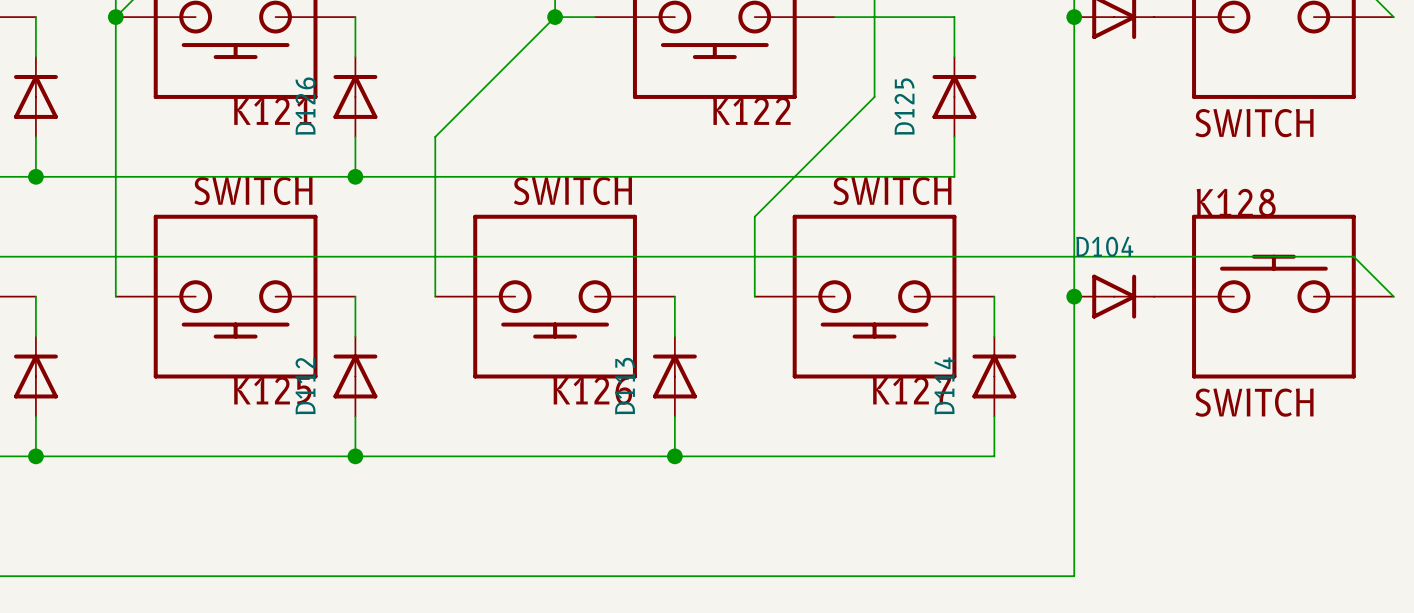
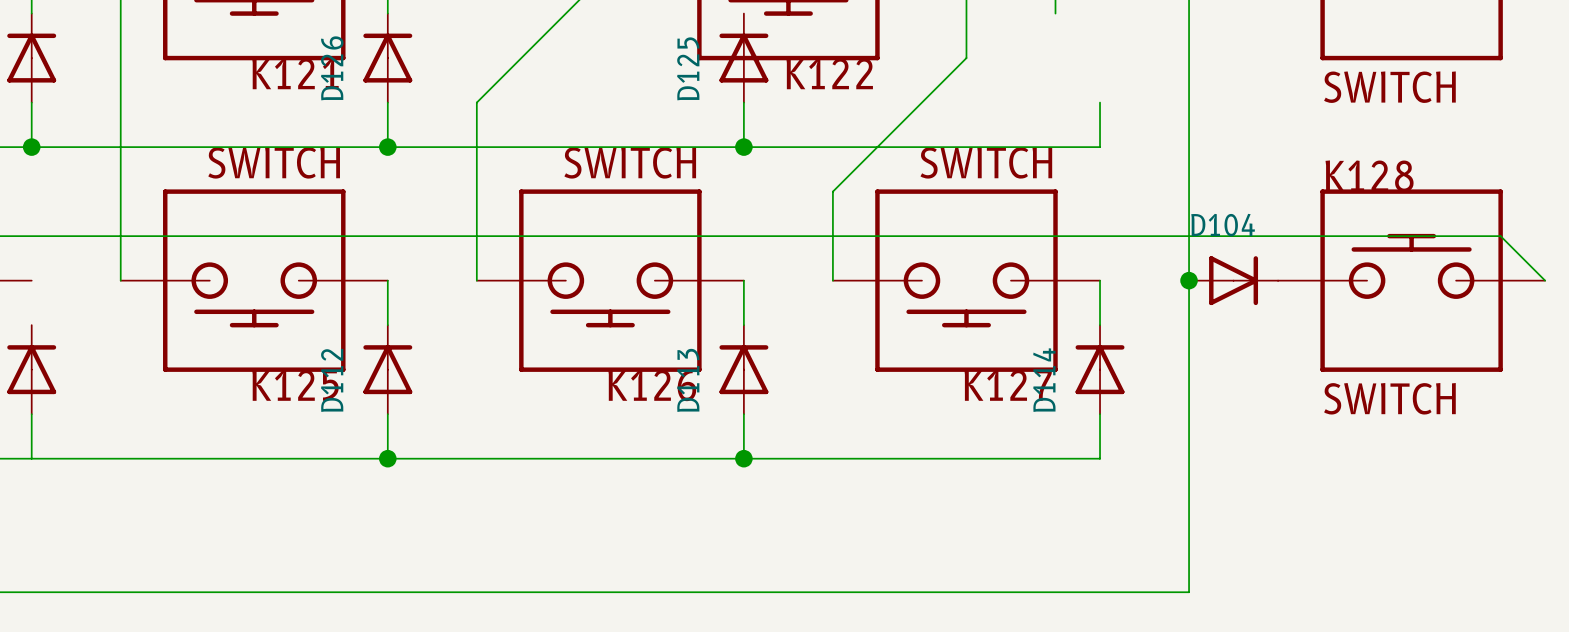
D125 position: (954, 96) -> (743, 58)
wire: none -> (743, 102) (743, 147)
wire: (954, 136) (954, 176) -> (1100, 102) (1100, 147) (1055, 147)
junction: none -> (743, 147)
wire: (35, 296) (35, 336) -> none
junction: (35, 456) -> none

